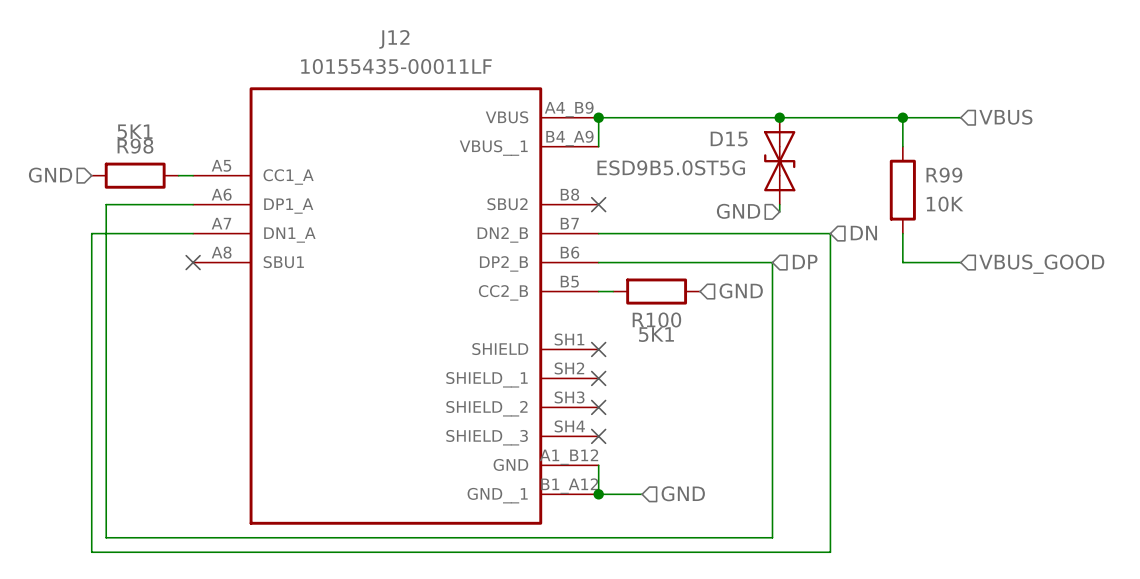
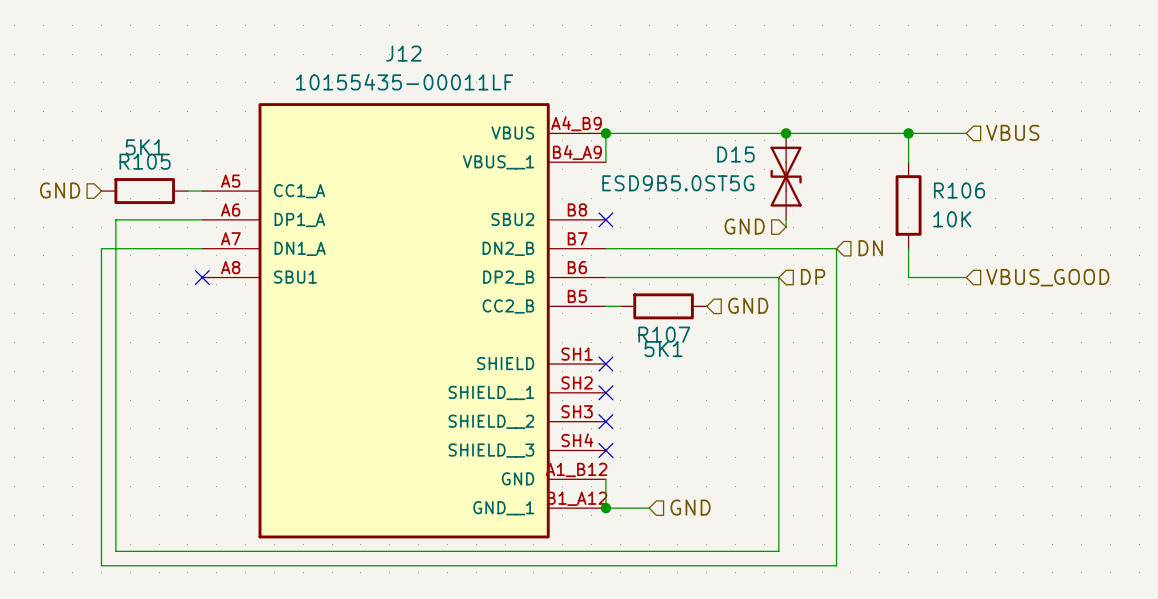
R98 name: R98 (135, 146) -> R105 (145, 161)
R99 name: R99 (944, 175) -> R106 (959, 190)
R100 name: R100 (656, 319) -> R107 (664, 334)

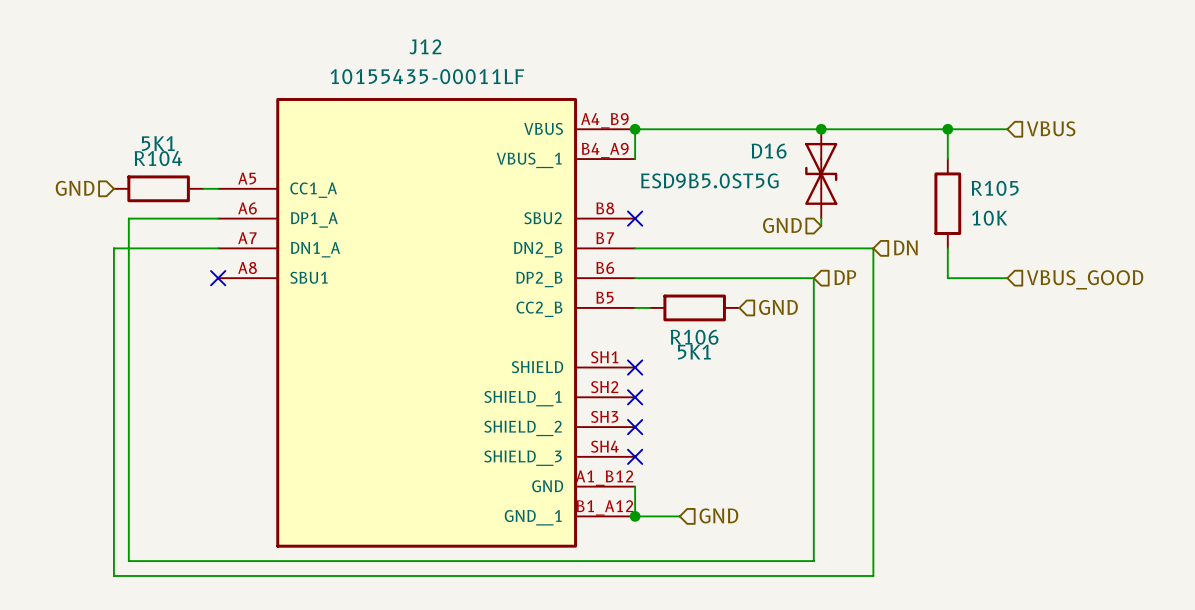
D15 name: D15 (735, 154) -> D16 (769, 151)
R105 name: R105 (145, 161) -> R104 (158, 158)
R106 name: R106 (959, 190) -> R105 (995, 188)
R107 name: R107 (664, 334) -> R106 (694, 337)

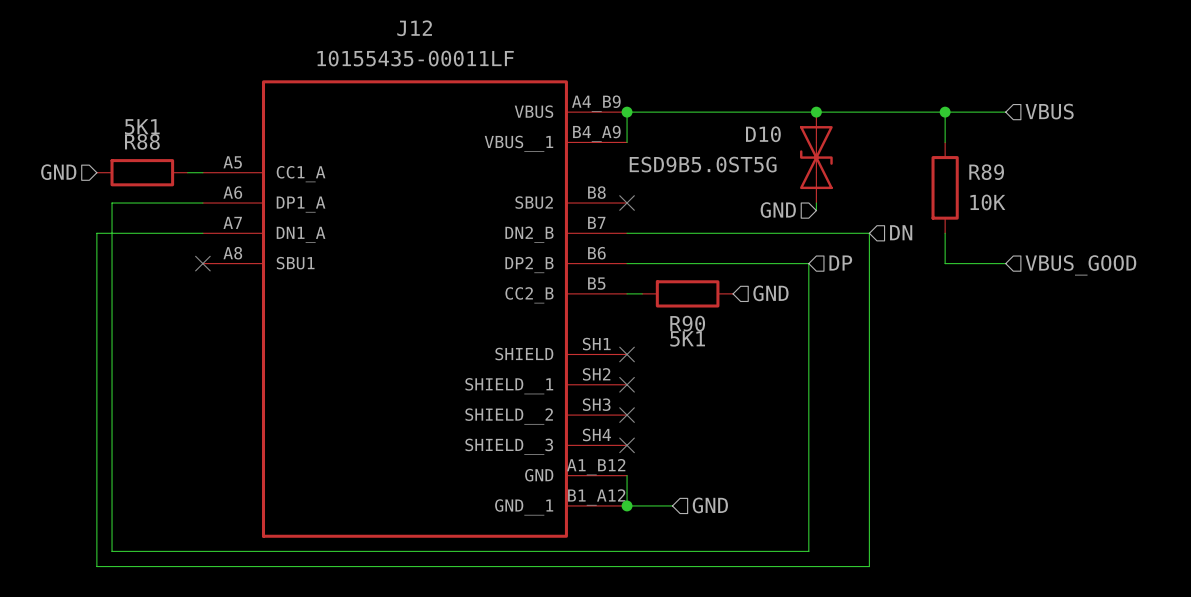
D16 name: D16 (769, 151) -> D10 (763, 134)
R104 name: R104 (158, 158) -> R88 (142, 141)
R105 name: R105 (995, 188) -> R89 (986, 172)
R106 name: R106 (694, 337) -> R90 (687, 323)

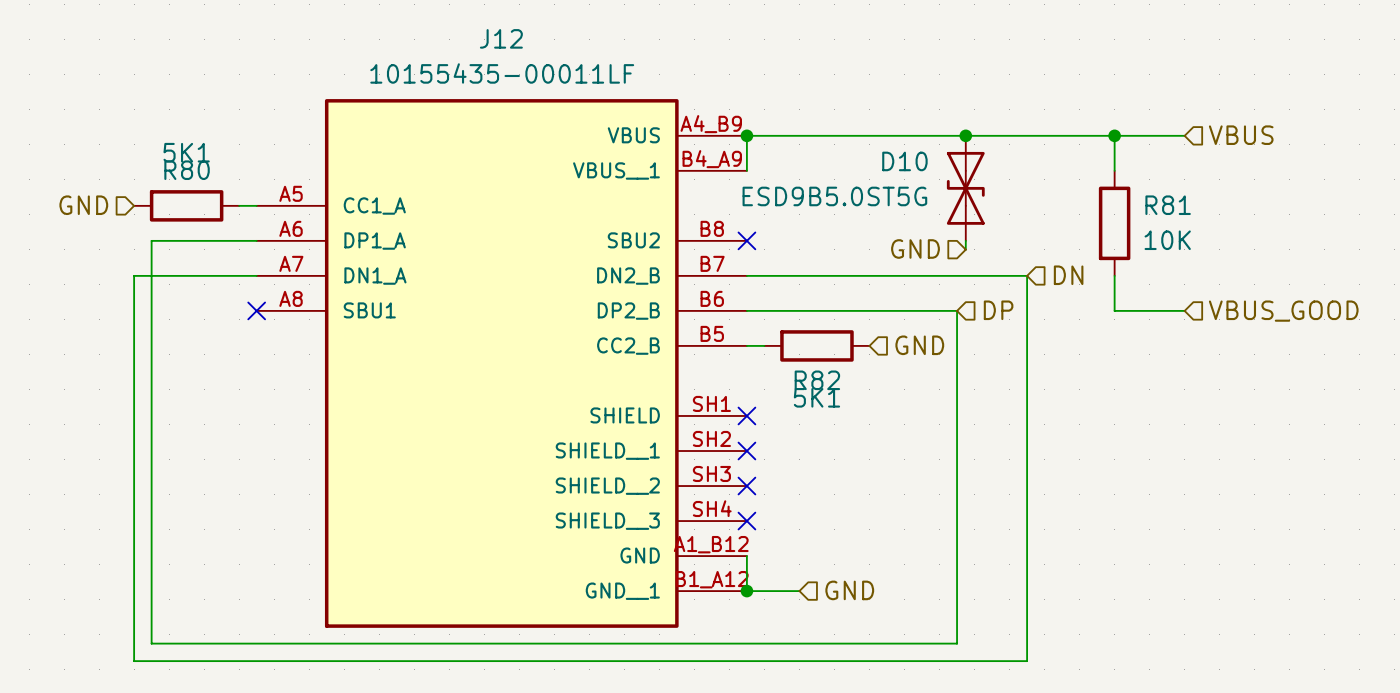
R88 name: R88 (142, 141) -> R80 (187, 170)
R89 name: R89 (986, 172) -> R81 (1168, 205)
R90 name: R90 (687, 323) -> R82 (817, 380)

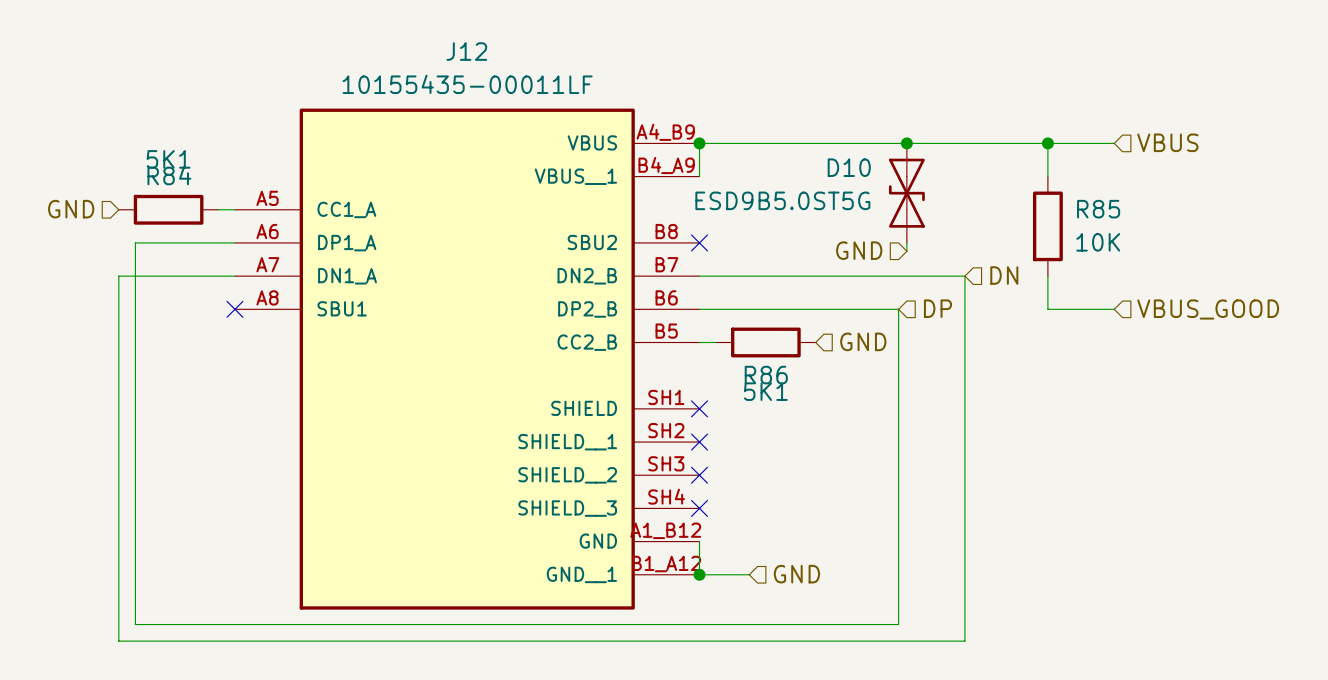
R80 name: R80 (187, 170) -> R84 (169, 175)
R81 name: R81 (1168, 205) -> R85 (1098, 209)
R82 name: R82 (817, 380) -> R86 (766, 375)

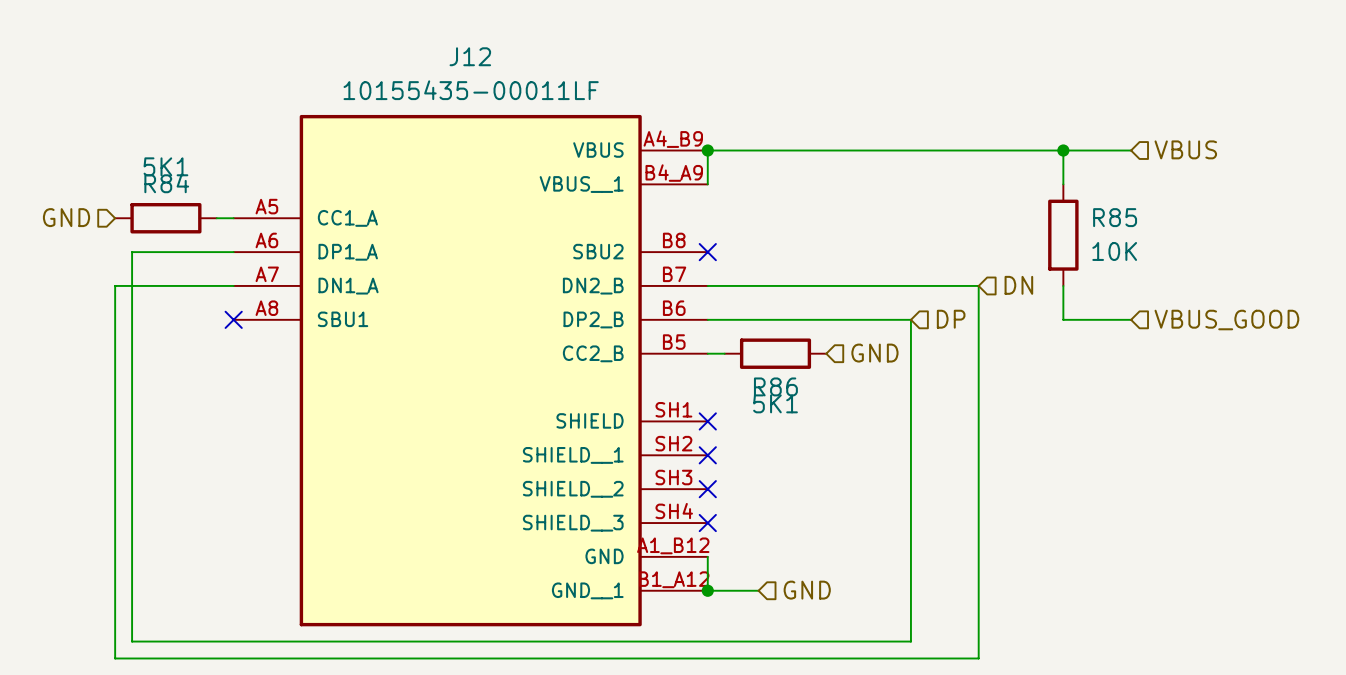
junction: (906, 143) -> none
D10: ESD9B5.0ST5G (906, 193) -> none
wire: (906, 242) (906, 251) -> none
hierarchical label: GND (859, 250) -> none

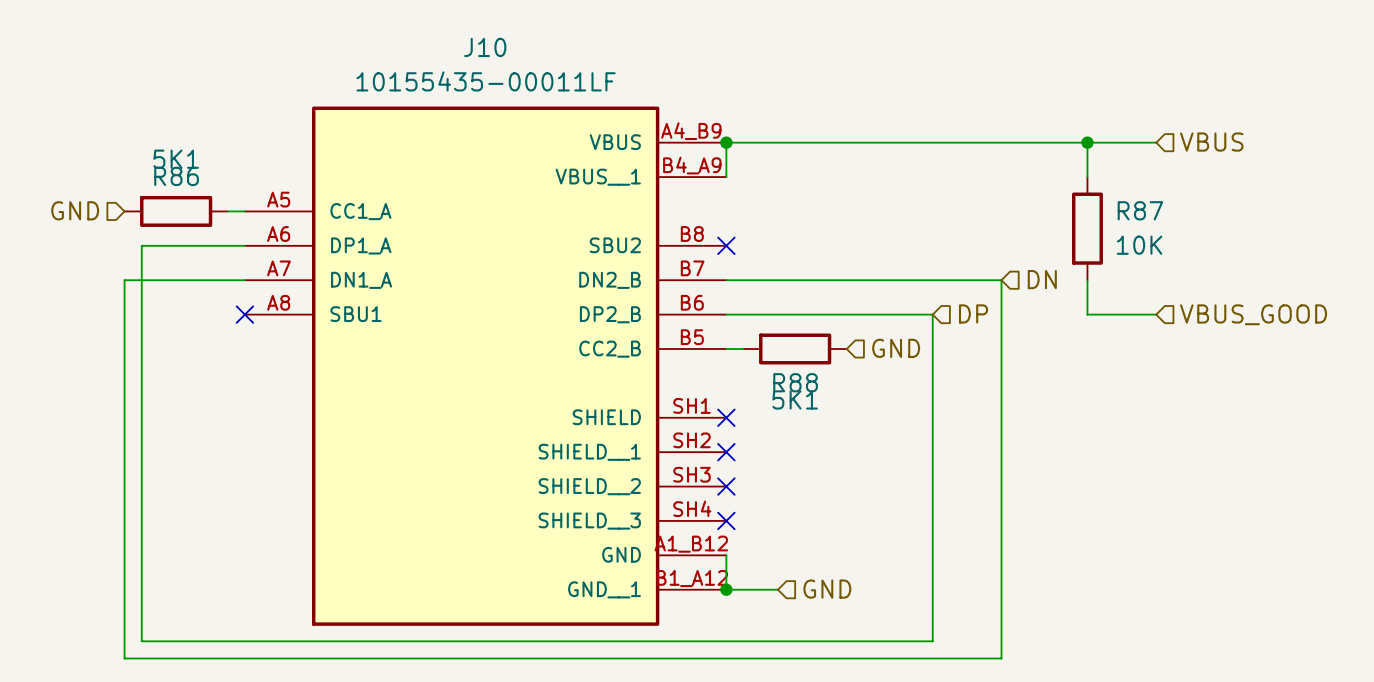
J12 name: J12 (470, 56) -> J10 (485, 47)
R84 name: R84 (166, 183) -> R86 (176, 176)
R85 name: R85 (1115, 217) -> R87 (1140, 210)
R86 name: R86 (775, 386) -> R88 (795, 382)

